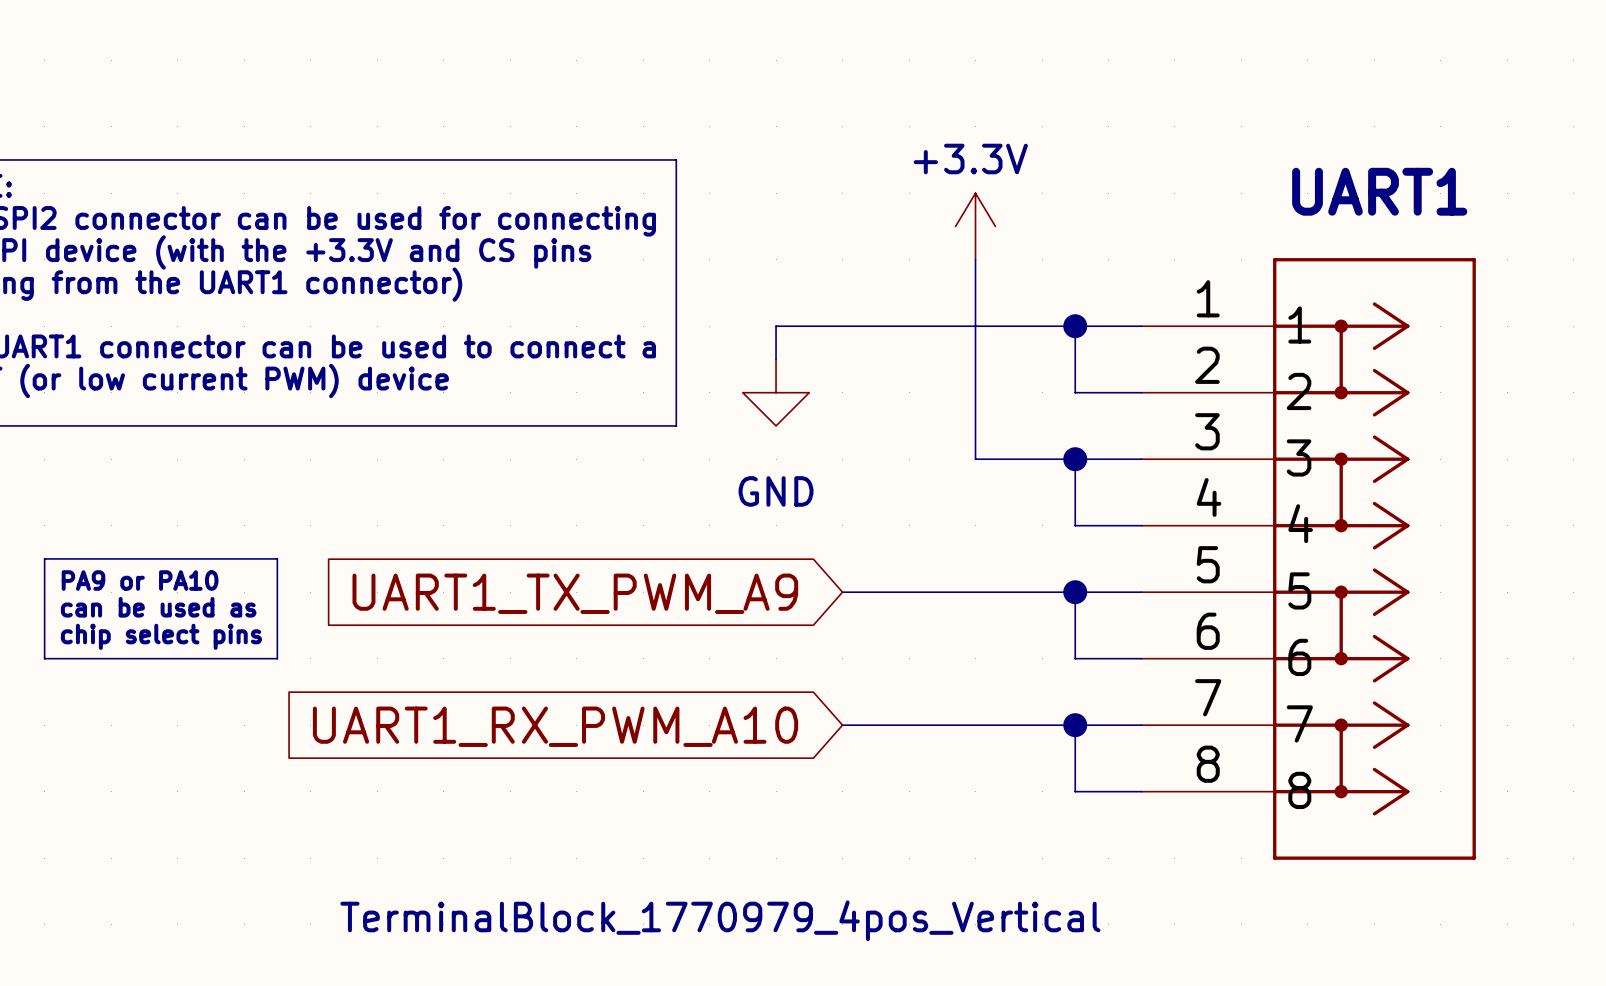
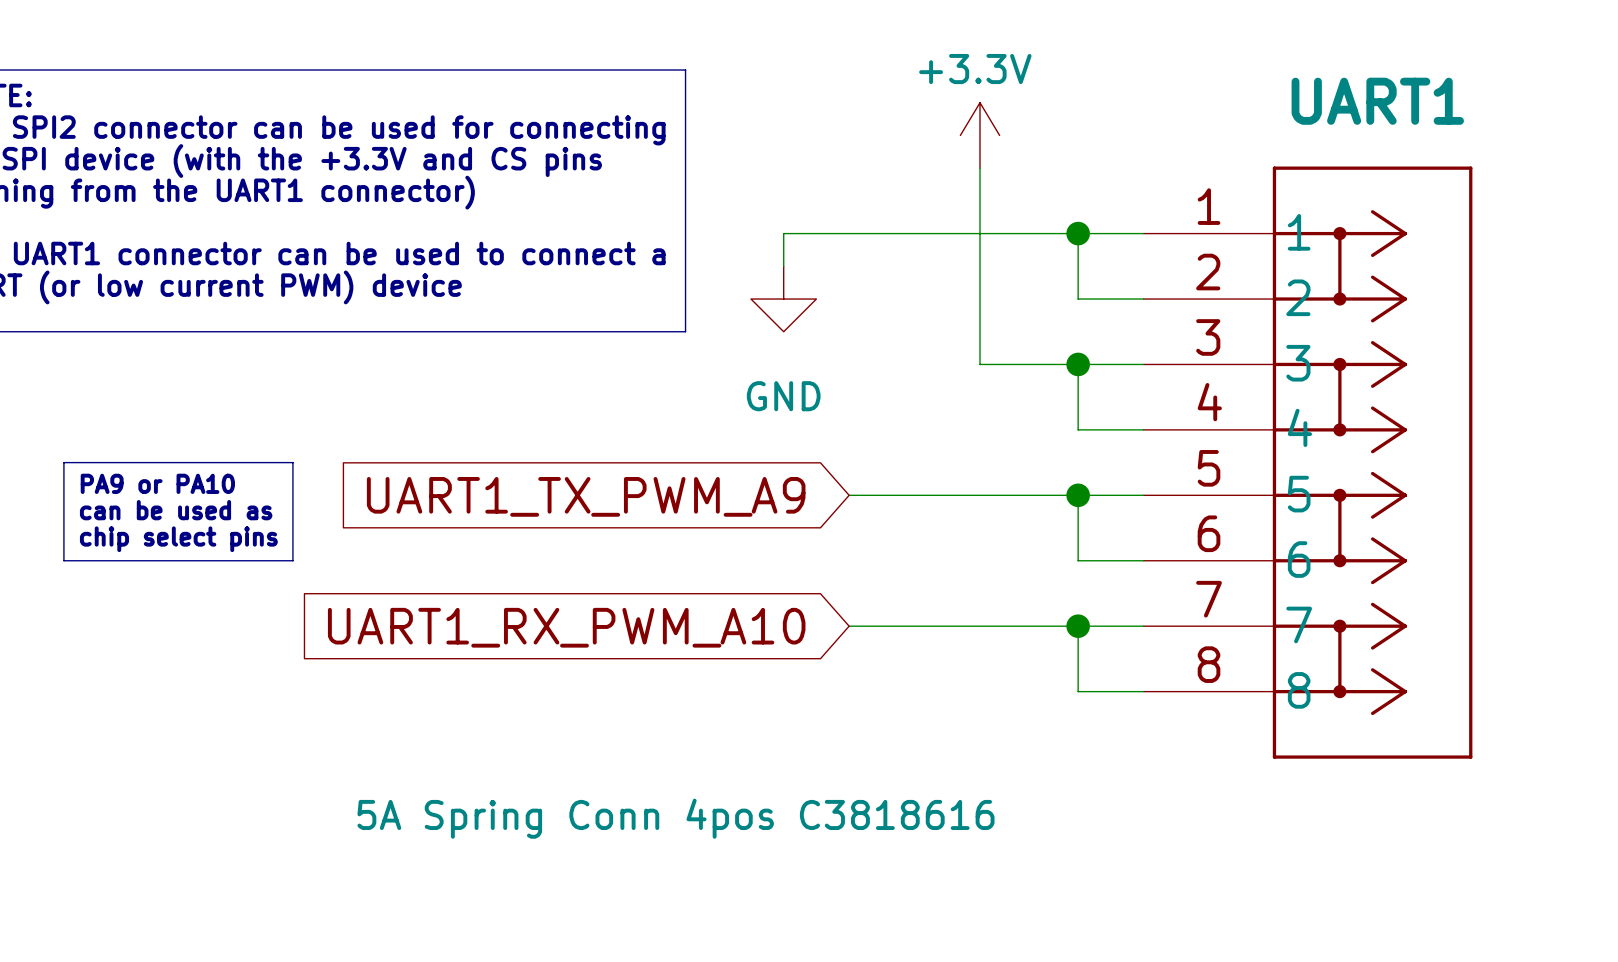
UART1 value: TerminalBlock_1770979_4pos_Vertical (720, 920) -> 5A Spring Conn 4pos C3818616 (675, 818)

